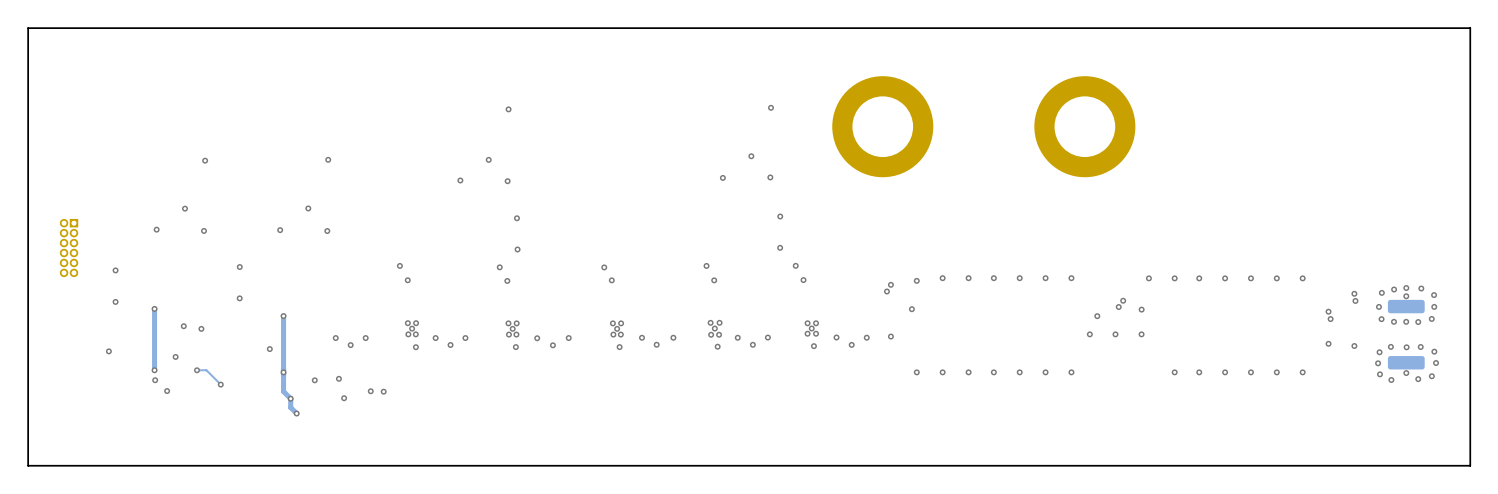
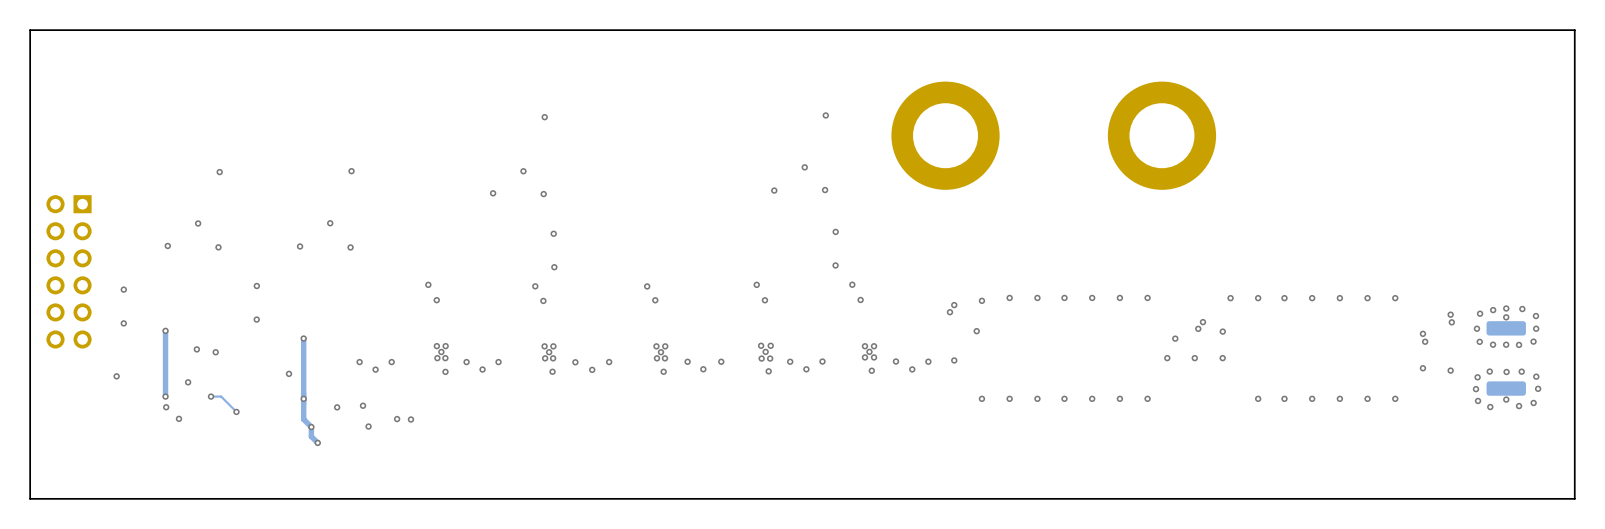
part footprint: [59, 218, 79, 278] -> [46, 195, 92, 349]

